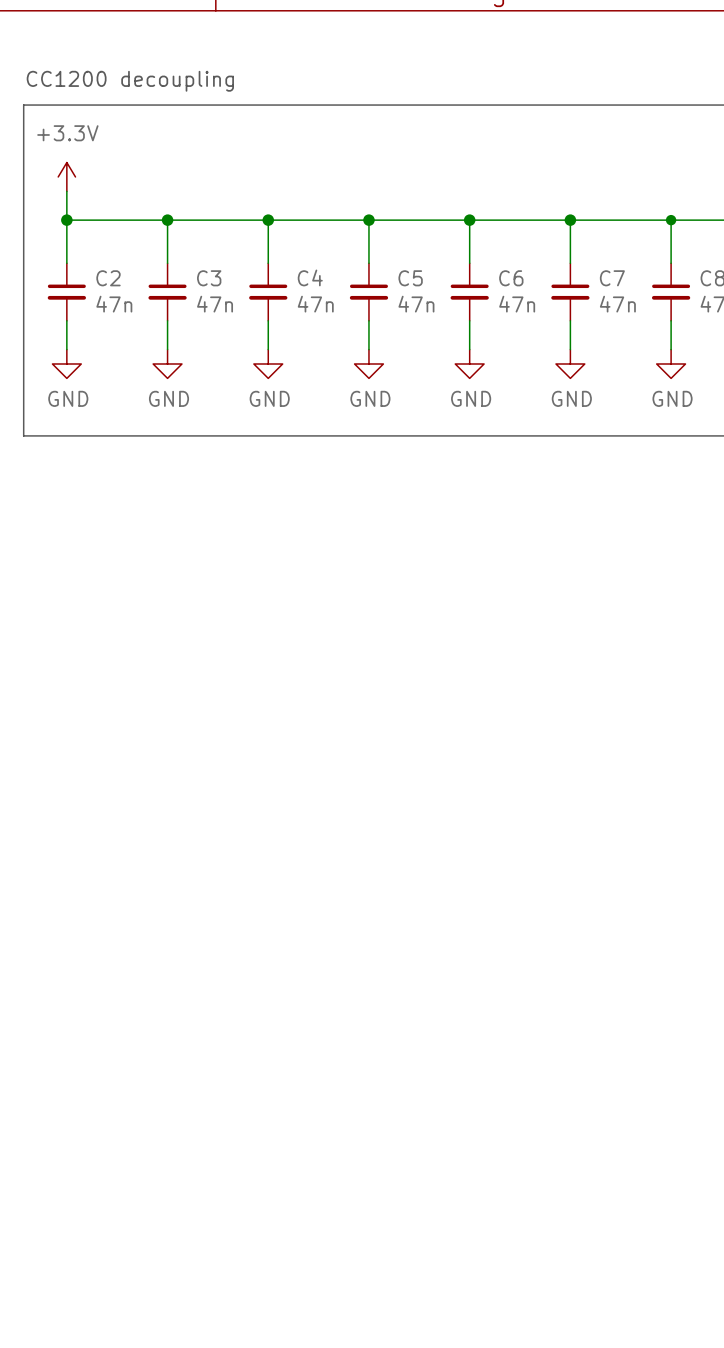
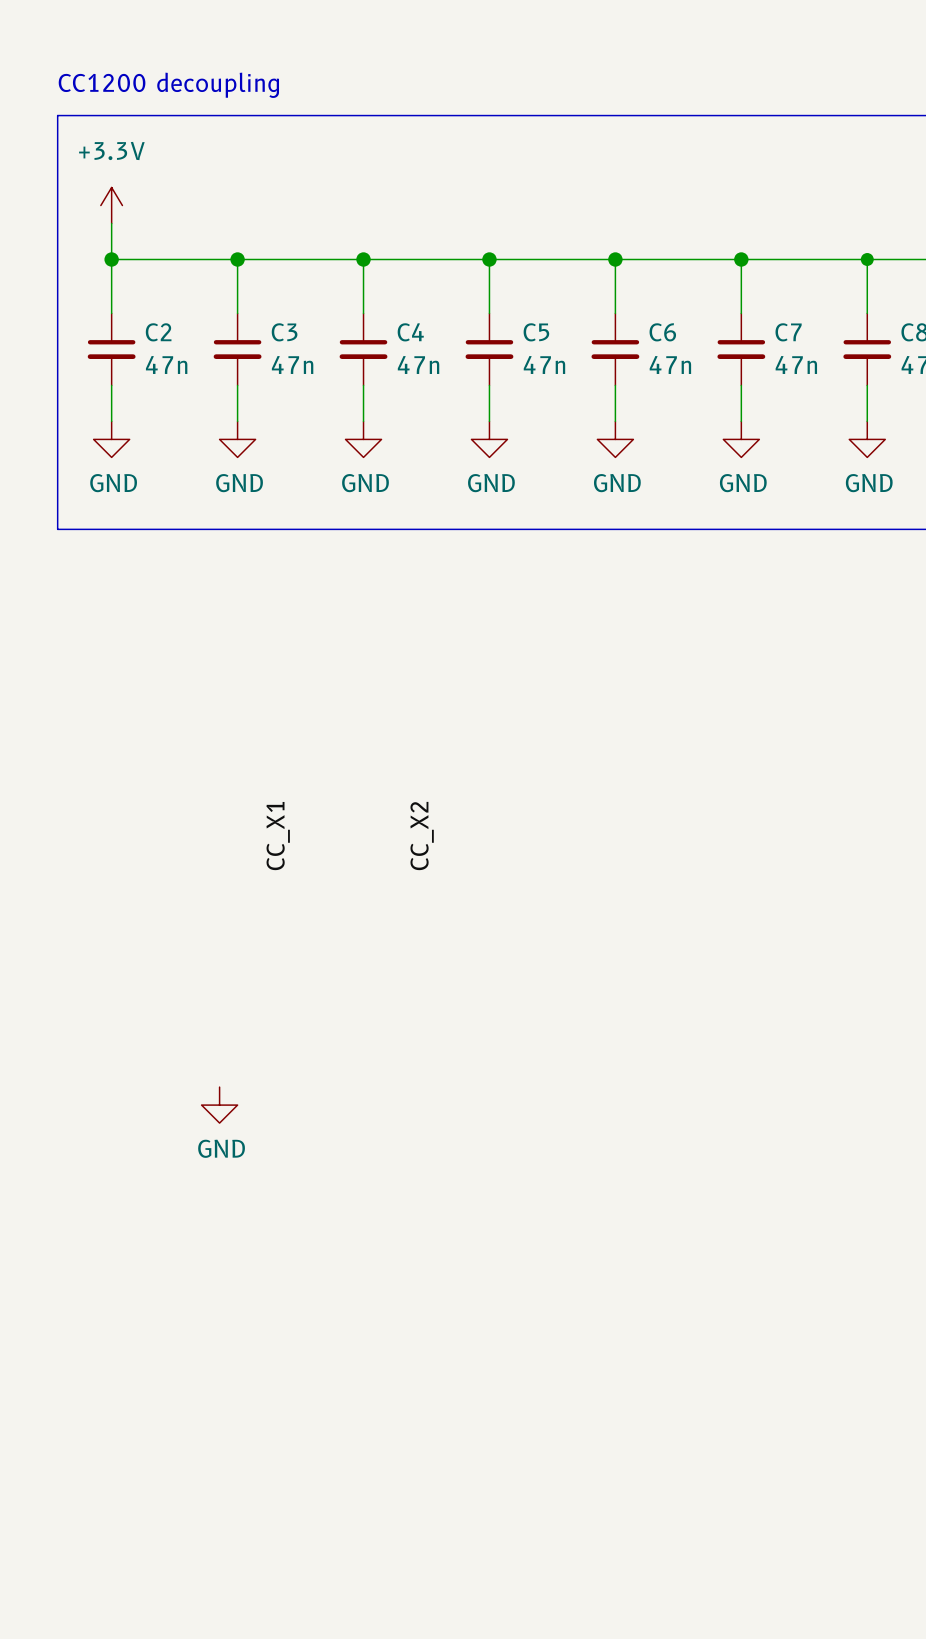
label: none -> CC_X1 (278, 836)
label: none -> CC_X2 (422, 836)
power symbol: none -> GND (219, 1105)

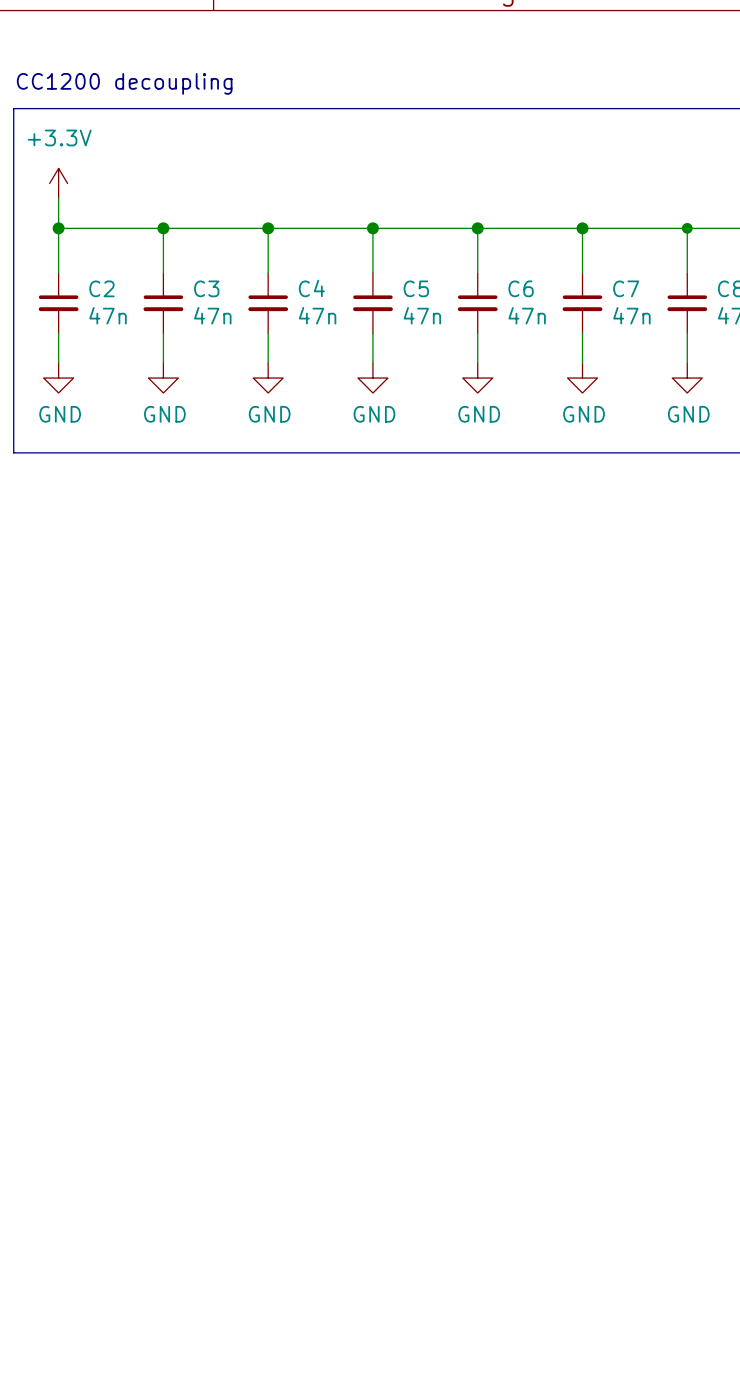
label: CC_X1 (278, 836) -> none
label: CC_X2 (422, 836) -> none
power symbol: GND (219, 1105) -> none

